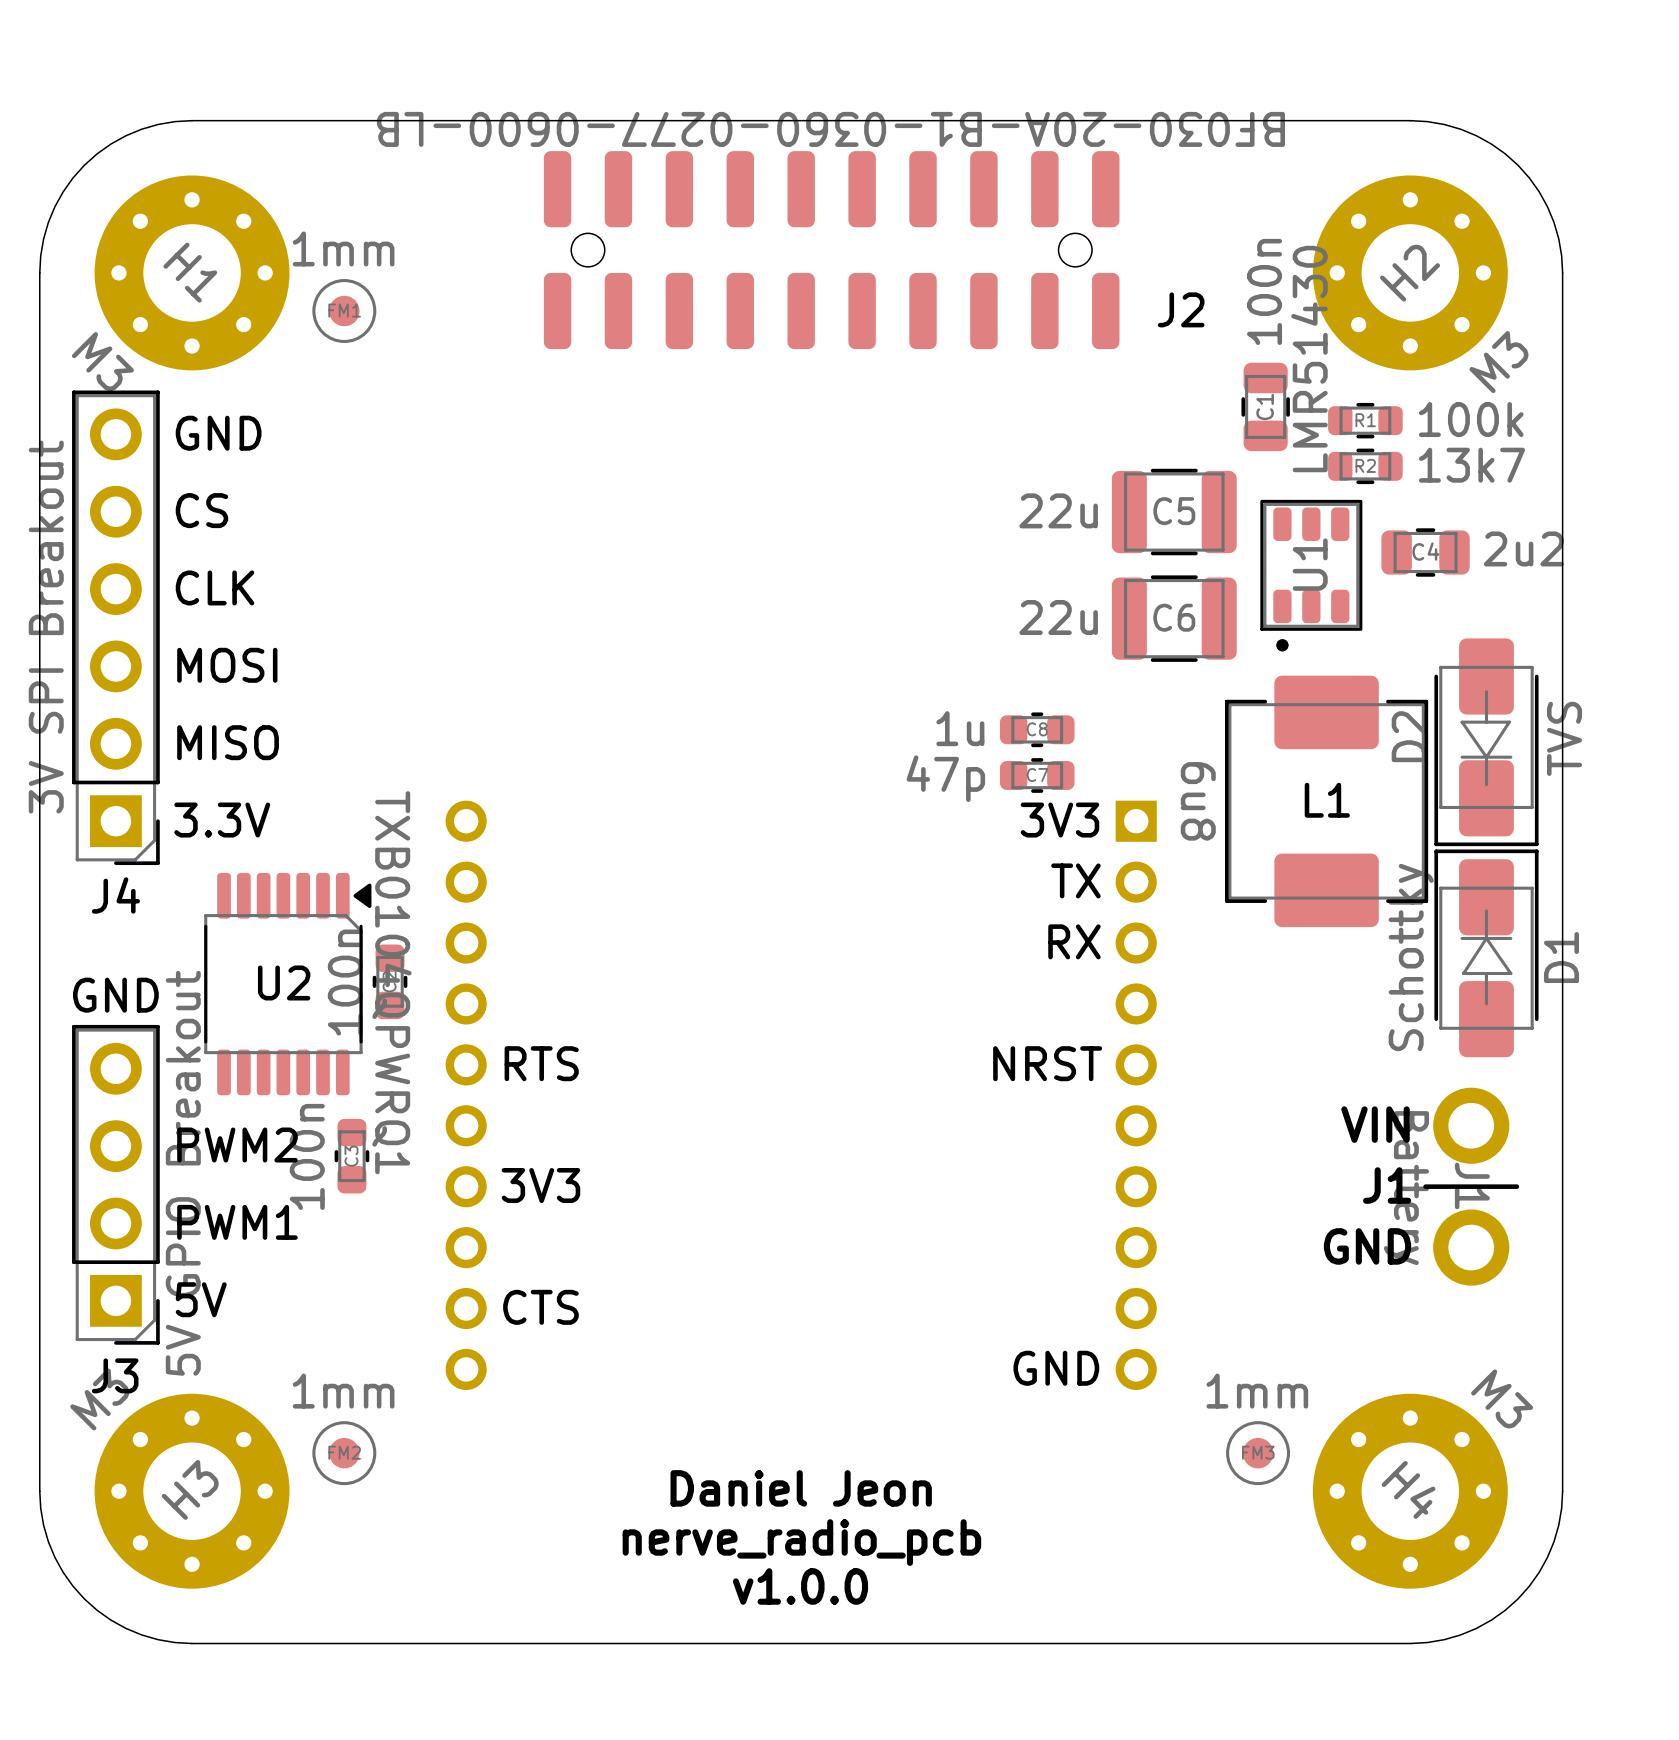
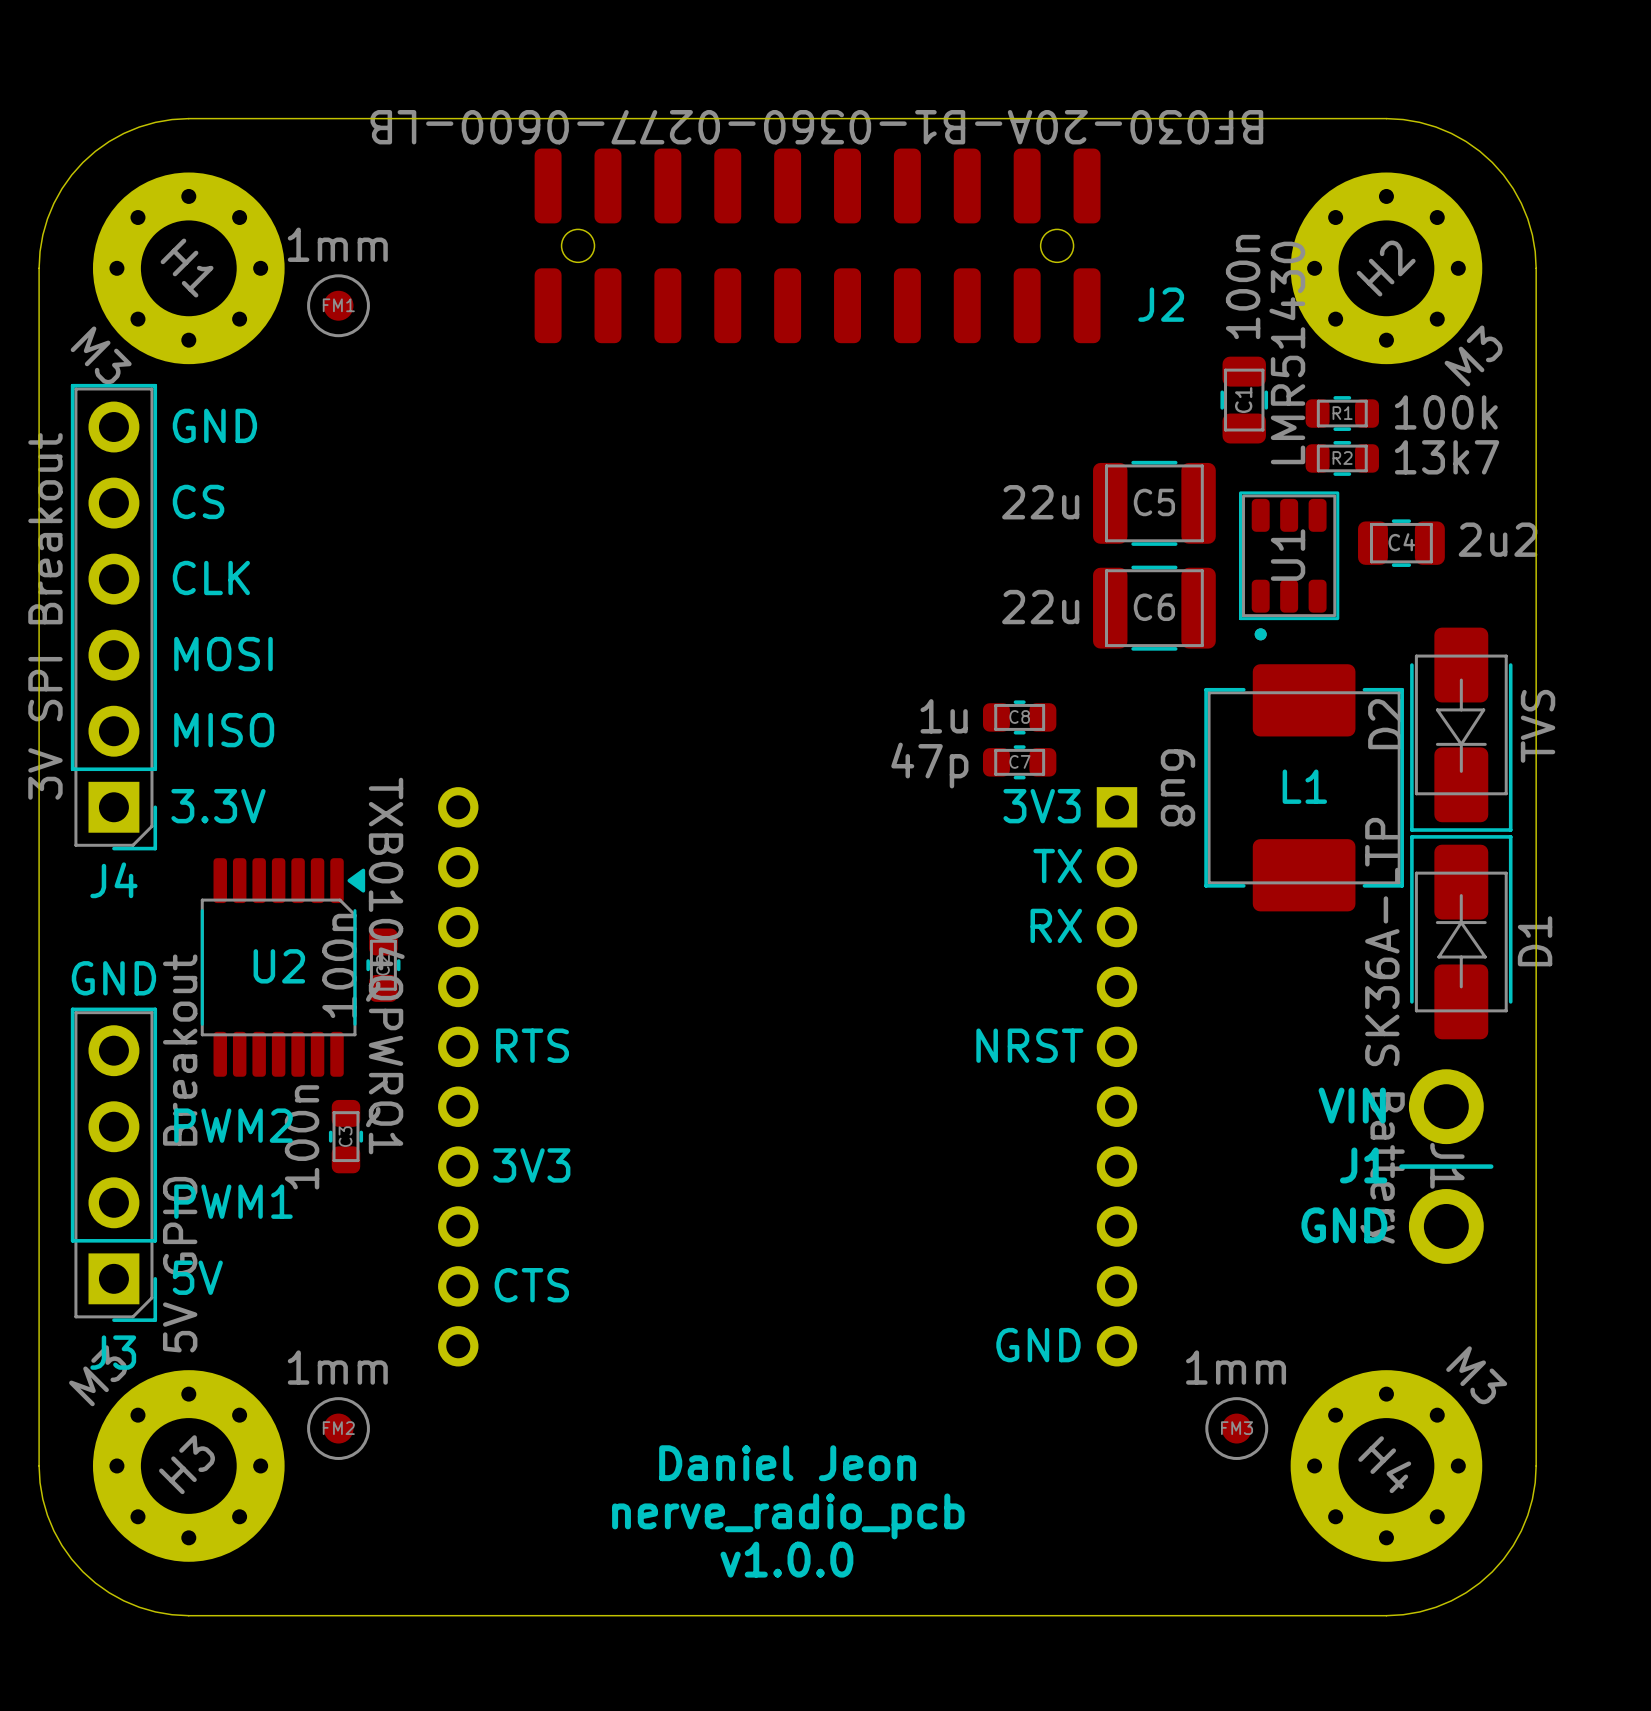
D1 value: Schottky (1411, 957) -> SK36A-LTP (1382, 942)

